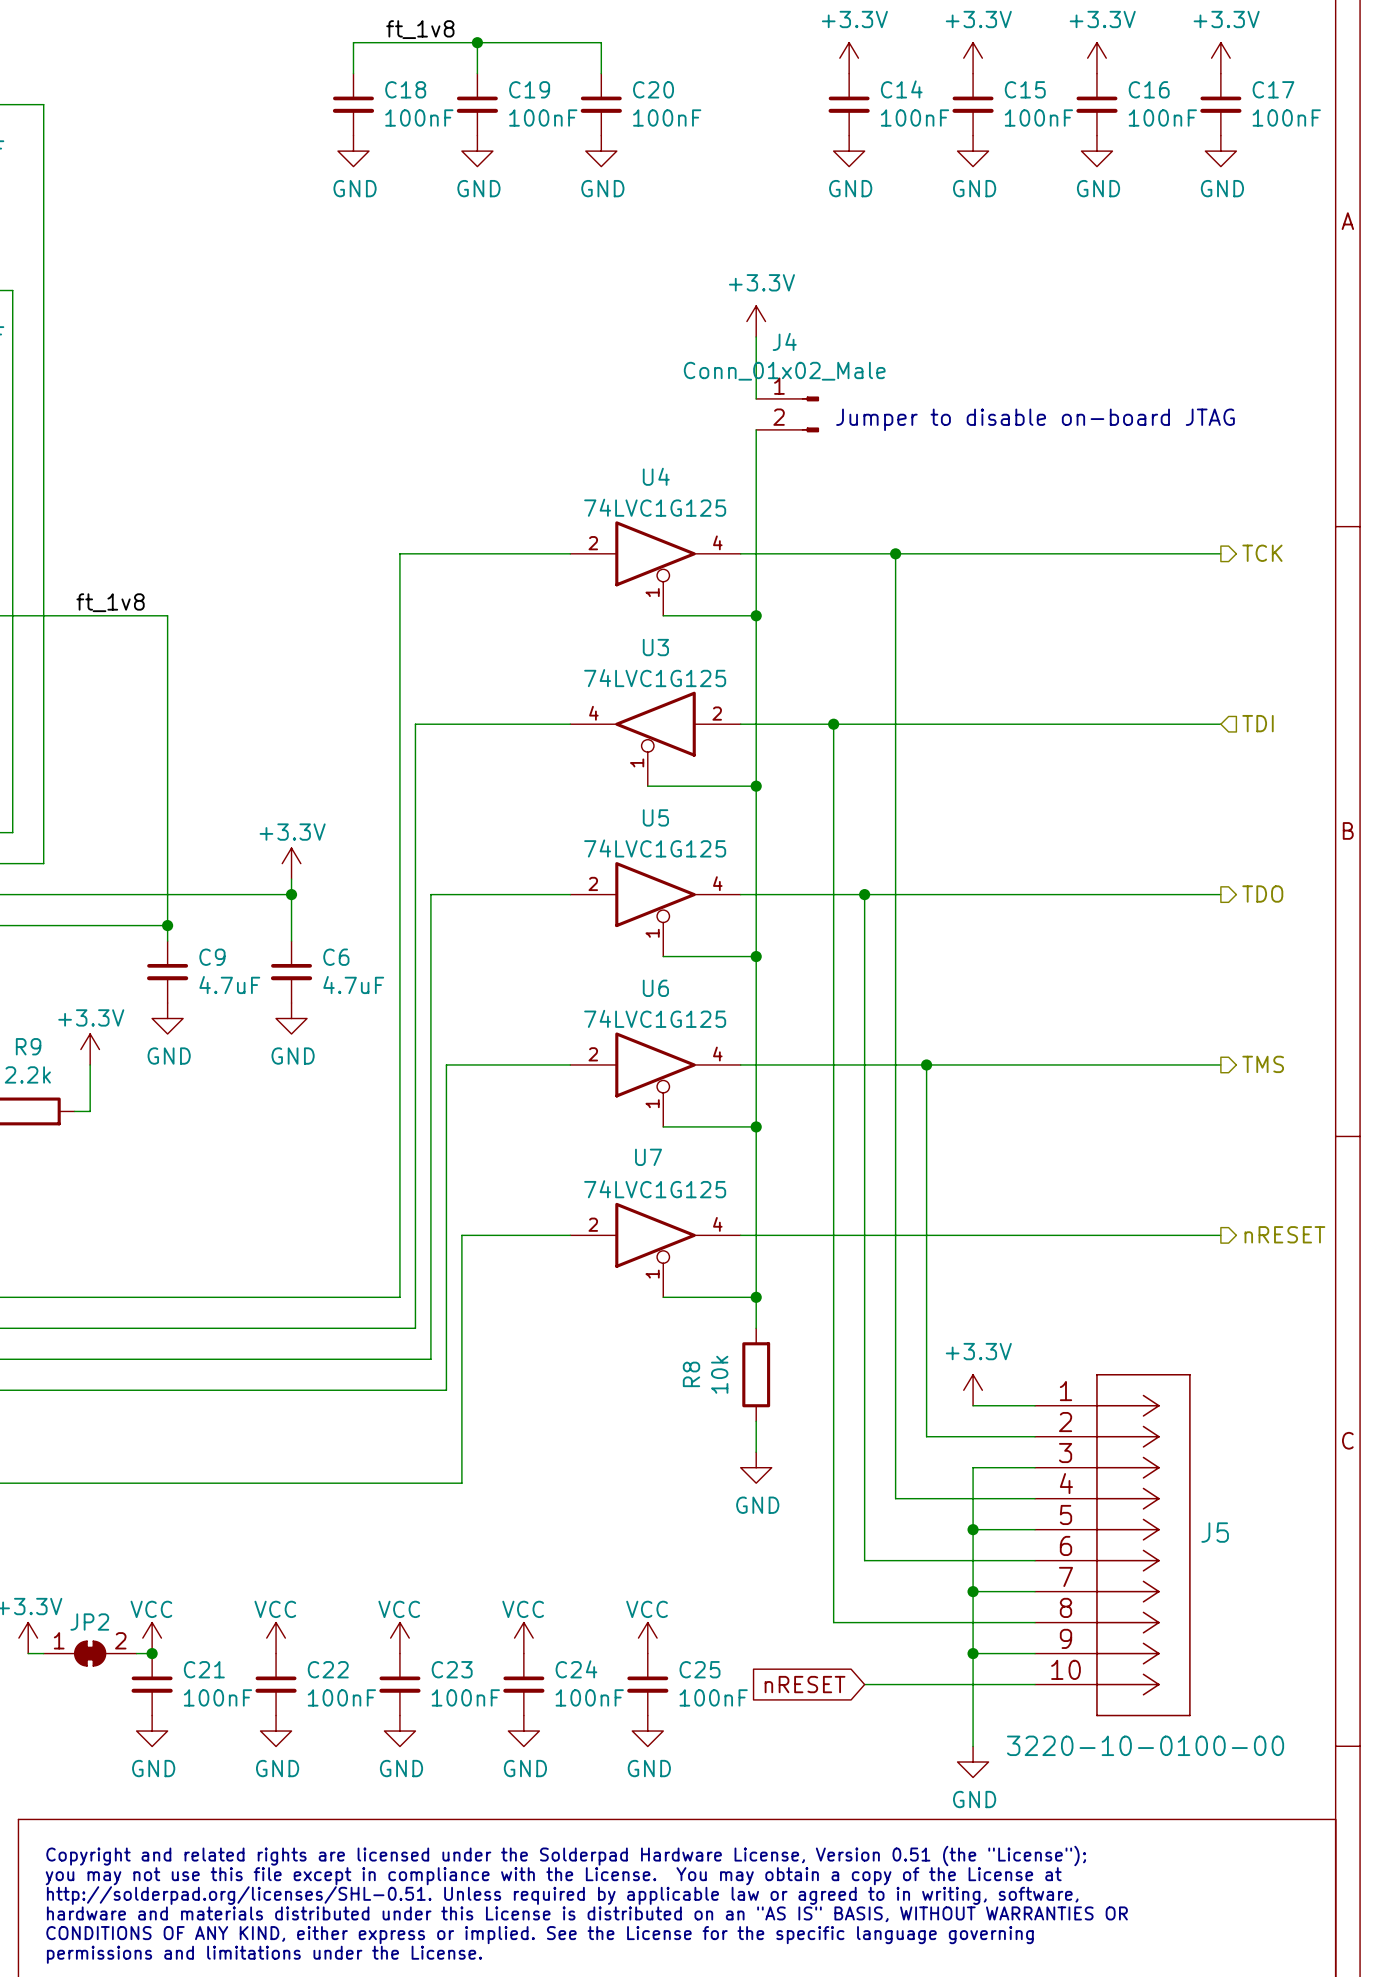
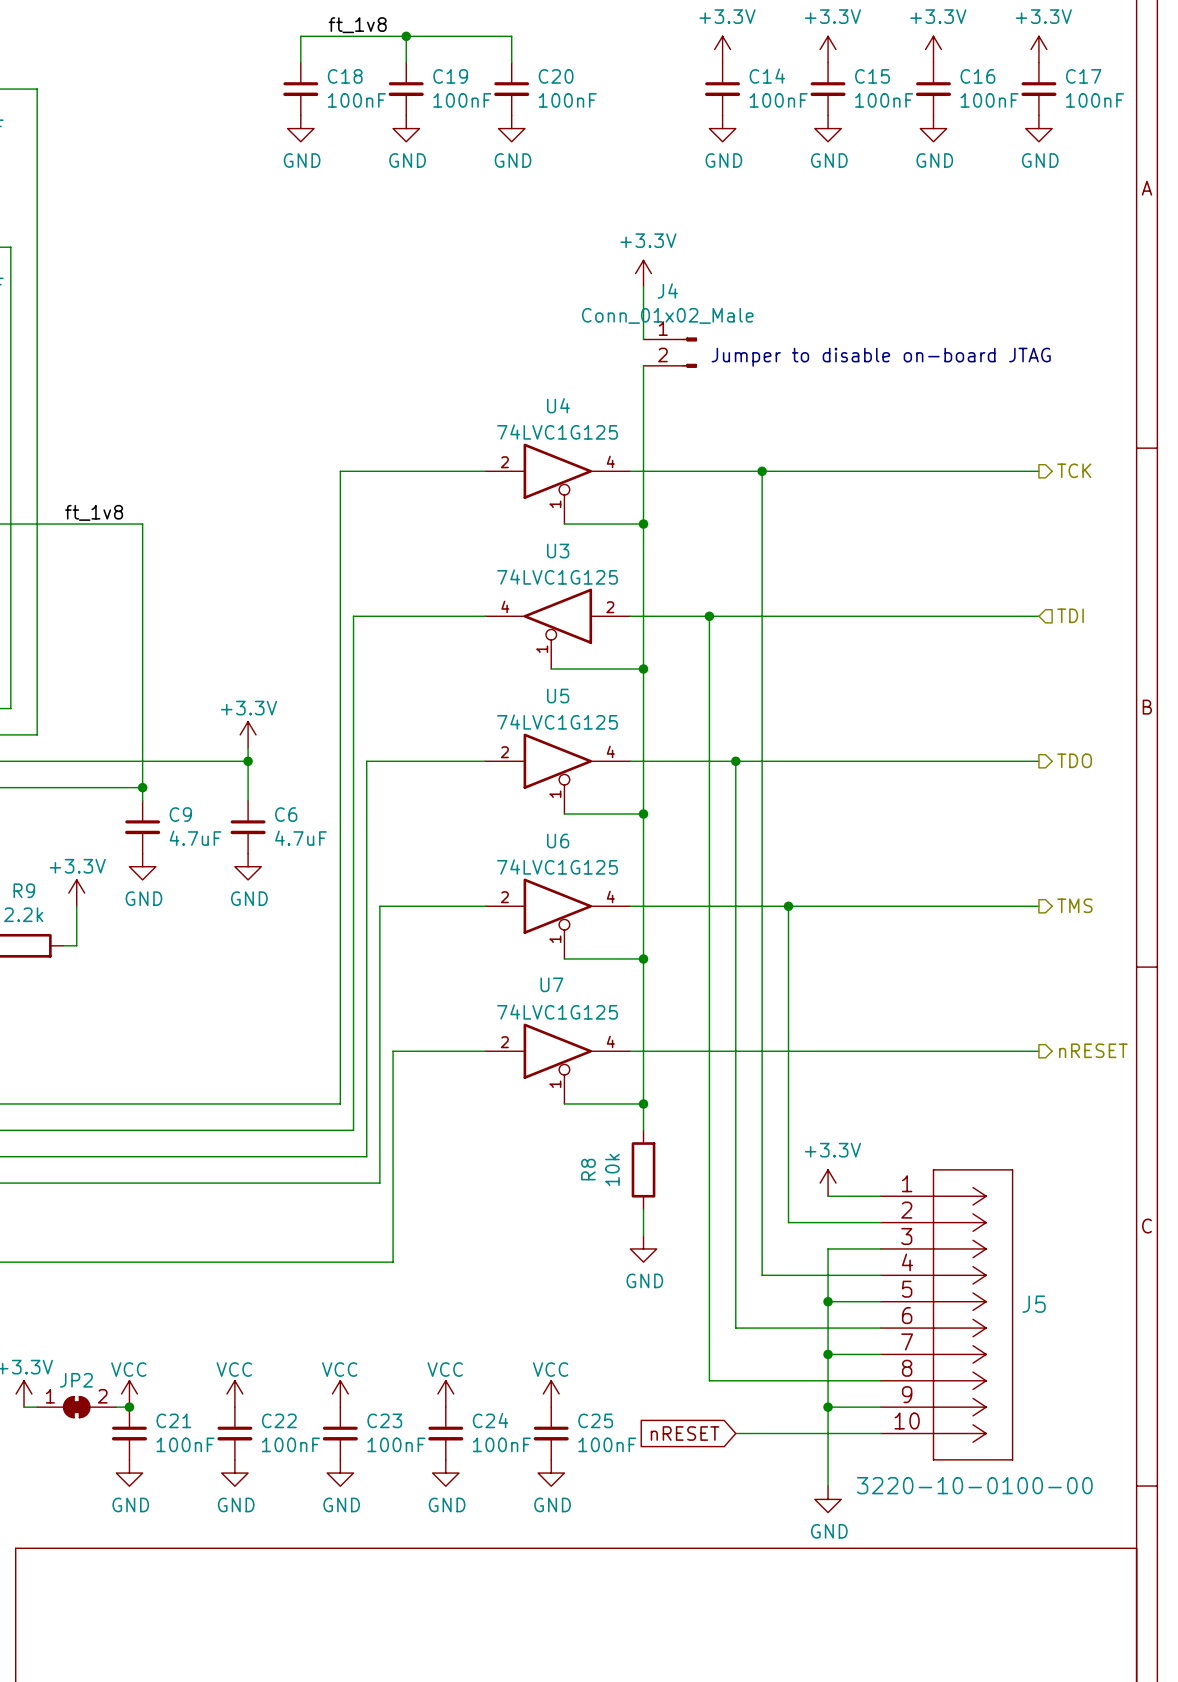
text: Copyright and related rights are licensed under the Solderpad Hardware License, Version 0.51 (the "License"); (566, 1855) -> none
text: you may not use this file except in compliance with the License. You may obtain a copy of the License at (553, 1876) -> none
text: http://solderpad.org/licenses/SHL-0.51. Unless required by applicable law or agreed to in writing, software, (562, 1895) -> none
text: hardware and materials distributed under this License is distributed on an "AS IS" BASIS, WITHOUT WARRANTIES OR (587, 1914) -> none
text: CONDITIONS OF ANY KIND, either express or implied. See the License for the specific language governing (540, 1935) -> none
text: permissions and limitations under the License. (264, 1954) -> none

